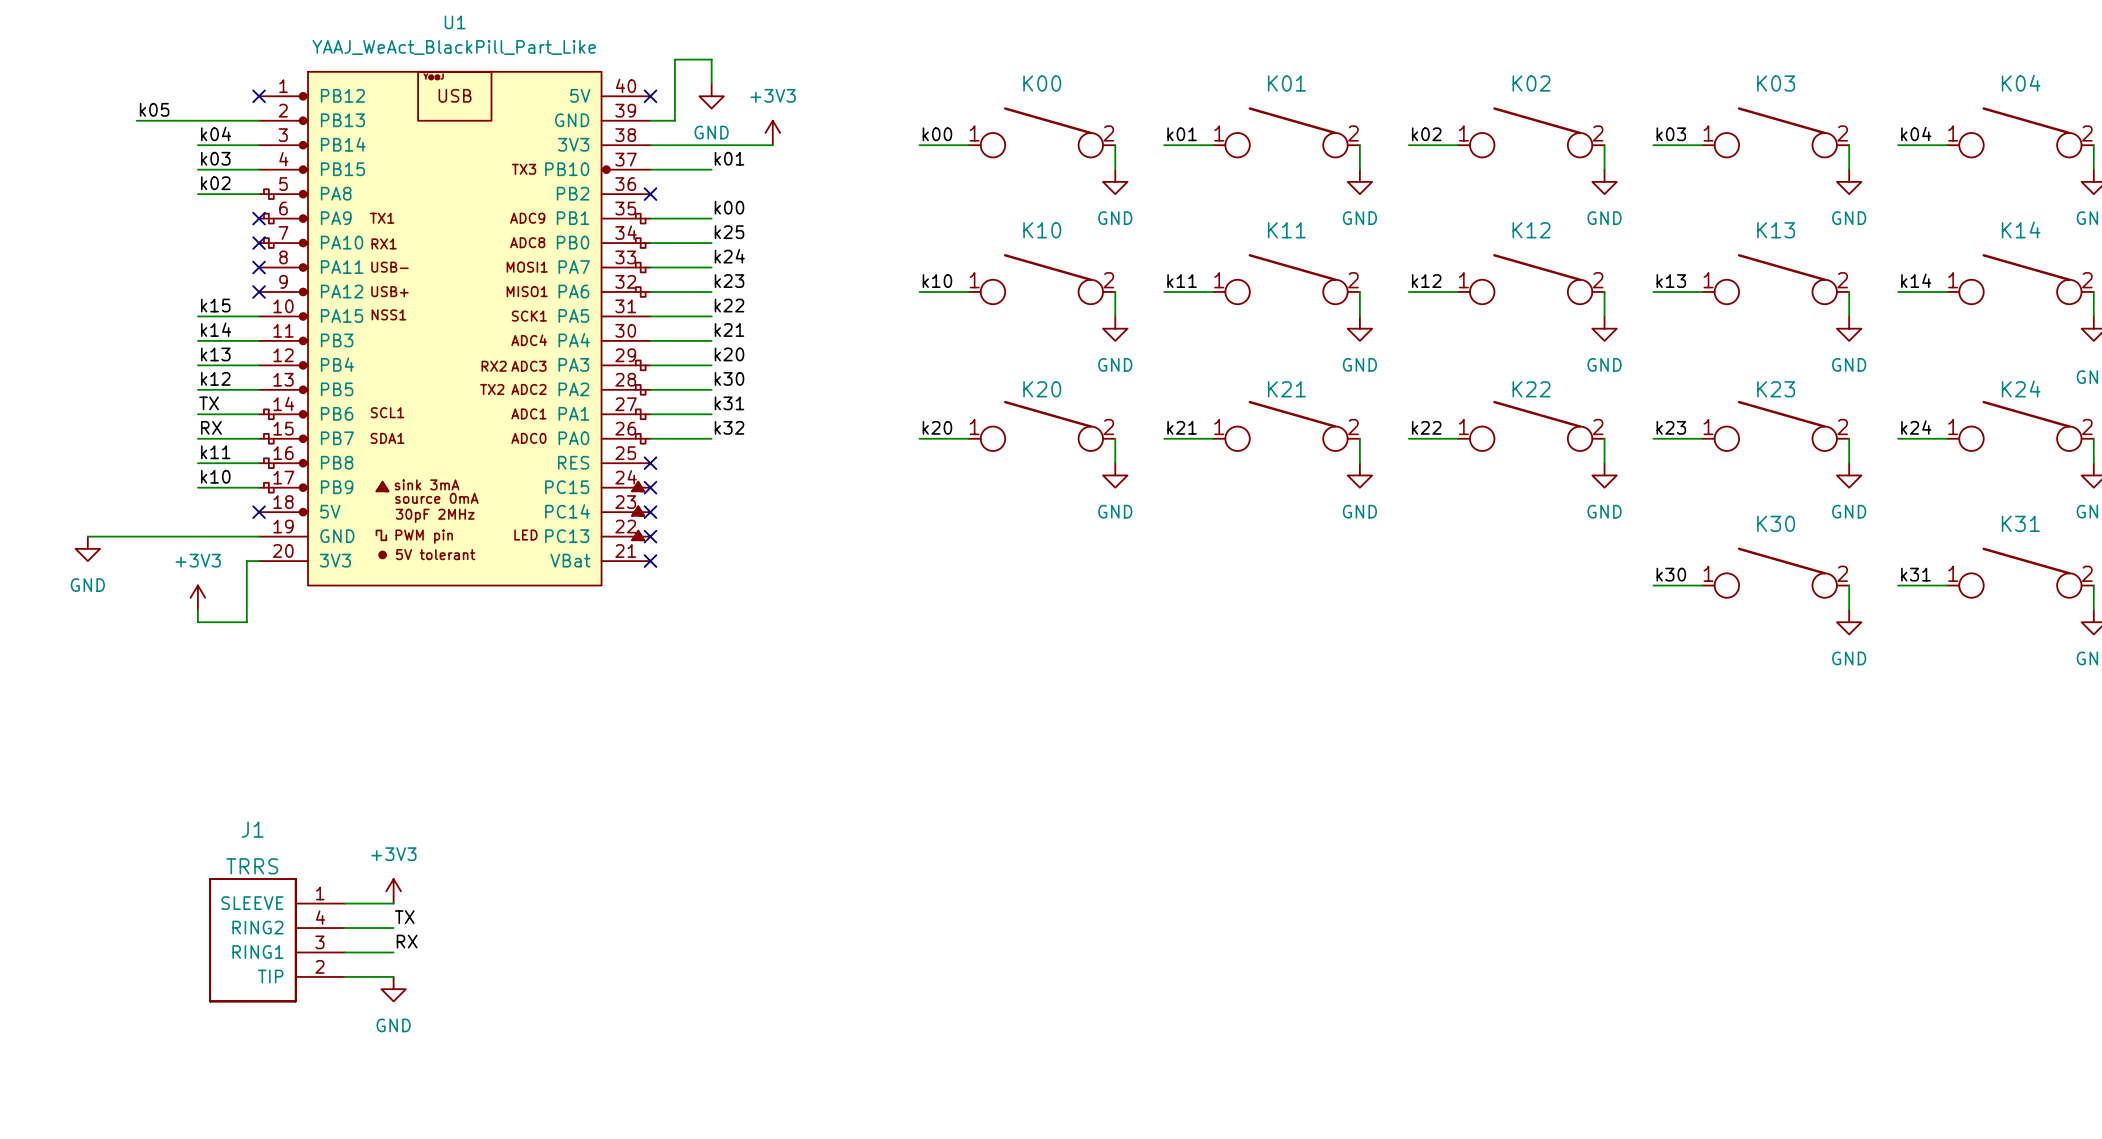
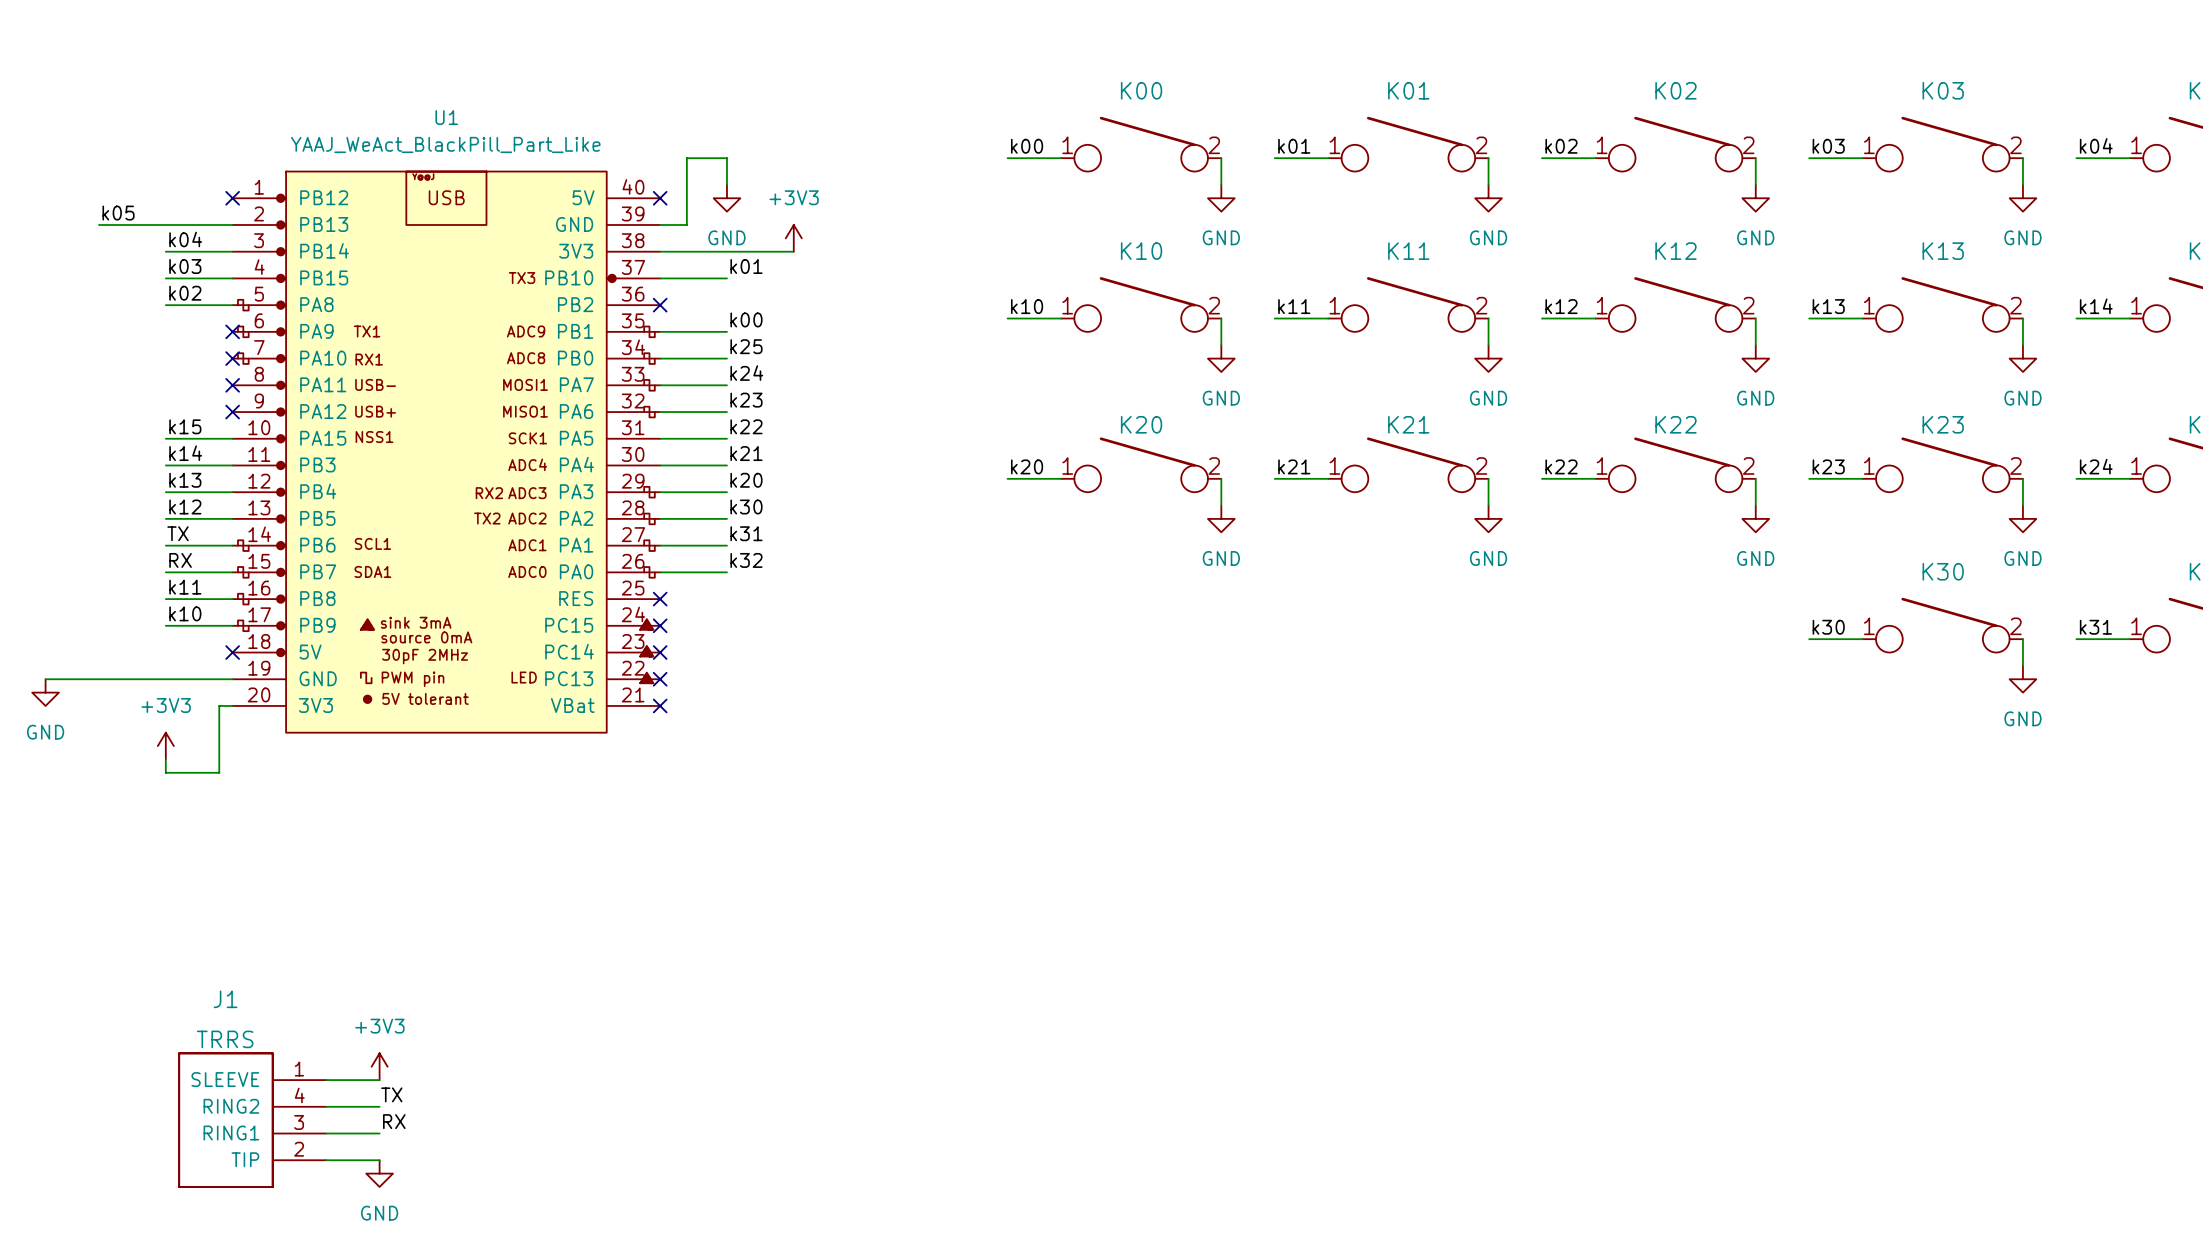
U1 symbol: [259, 71, 651, 586] -> [232, 171, 661, 733]
wire: (711, 84) (711, 59) (674, 59) (674, 120) (650, 120) -> none
no-connect mark: (259, 96) -> none
no-connect mark: (650, 96) -> none
power symbol position: GND (711, 96) -> GND (726, 198)
label position: k05 (154, 109) -> k05 (118, 213)
wire: (136, 120) (259, 120) -> (99, 224) (232, 224)
power symbol position: +3V3 (772, 132) -> +3V3 (793, 238)
label position: k04 (216, 134) -> k04 (185, 239)
wire: (197, 145) (259, 145) -> (165, 251) (232, 251)
wire: none -> (713, 158) (686, 158) (686, 224) (660, 224)
wire: (662, 145) (772, 145) -> (726, 158) (726, 184)
label position: k03 (215, 158) -> k03 (185, 266)
label position: k01 (729, 158) -> k01 (746, 266)
wire: (197, 169) (259, 169) -> (165, 278) (232, 278)
wire: (650, 169) (711, 169) -> (660, 278) (726, 278)
no-connect mark: none -> (232, 198)
no-connect mark: none -> (660, 198)
label position: k02 (215, 183) -> k02 (185, 293)
wire: (197, 194) (259, 194) -> (165, 305) (232, 305)
no-connect mark: (650, 194) -> none
label position: k00 (729, 207) -> k00 (746, 319)
no-connect mark: (259, 218) -> none
wire: (650, 218) (711, 218) -> (660, 331) (726, 331)
wire: none -> (660, 251) (793, 251)
label position: k25 (729, 232) -> k25 (746, 346)
no-connect mark: (259, 243) -> none
wire: (650, 243) (711, 243) -> (660, 358) (726, 358)
label position: k24 (729, 256) -> k24 (746, 373)
no-connect mark: (259, 267) -> none
wire: (650, 267) (711, 267) -> (660, 385) (726, 385)
no-connect mark: none -> (660, 305)
label position: k23 (729, 281) -> k23 (746, 400)
no-connect mark: (259, 291) -> none
wire: (650, 291) (711, 291) -> (660, 412) (726, 412)
no-connect mark: none -> (232, 331)
label position: k15 (215, 305) -> k15 (185, 426)
label position: k22 (729, 305) -> k22 (746, 426)
wire: (197, 316) (259, 316) -> (165, 438) (232, 438)
wire: (650, 316) (711, 316) -> (660, 438) (726, 438)
no-connect mark: none -> (232, 358)
label position: k14 (216, 329) -> k14 (185, 453)
label position: k21 (729, 329) -> k21 (746, 453)
wire: (197, 340) (259, 340) -> (165, 465) (232, 465)
wire: (650, 340) (711, 340) -> (660, 465) (726, 465)
no-connect mark: none -> (232, 385)
label position: k13 (215, 354) -> k13 (185, 480)
label position: k20 (729, 354) -> k20 (746, 480)
wire: (197, 365) (259, 365) -> (165, 492) (232, 492)
wire: (650, 365) (711, 365) -> (660, 492) (726, 492)
no-connect mark: none -> (232, 412)
label position: k12 (215, 378) -> k12 (185, 507)
label position: k30 (729, 378) -> k30 (746, 507)
wire: (197, 389) (259, 389) -> (165, 518) (232, 518)
wire: (650, 389) (711, 389) -> (660, 518) (726, 518)
label position: TX (209, 403) -> TX (178, 533)
label position: k31 (729, 403) -> k31 (746, 533)
wire: (197, 414) (259, 414) -> (165, 545) (232, 545)
wire: (650, 414) (711, 414) -> (660, 545) (726, 545)
label position: RX (211, 427) -> RX (180, 560)
label position: k32 (729, 427) -> k32 (746, 560)
wire: (197, 438) (259, 438) -> (165, 572) (232, 572)
wire: (650, 438) (711, 438) -> (660, 572) (726, 572)
label position: k11 (215, 452) -> k11 (185, 587)
wire: (197, 463) (259, 463) -> (165, 599) (232, 599)
no-connect mark: (650, 463) -> none
label position: k10 (215, 476) -> k10 (185, 613)
wire: (197, 487) (259, 487) -> (165, 625) (232, 625)
no-connect mark: (650, 487) -> none
no-connect mark: (259, 512) -> none
no-connect mark: (650, 512) -> none
wire: (87, 536) (259, 536) -> none
no-connect mark: (650, 536) -> none
power symbol position: GND (87, 548) -> GND (45, 692)
no-connect mark: none -> (660, 599)
wire: (259, 561) (246, 561) (246, 622) (210, 622) -> none
no-connect mark: (650, 561) -> none
no-connect mark: none -> (660, 625)
power symbol position: +3V3 (197, 597) -> +3V3 (165, 746)
no-connect mark: none -> (232, 652)
no-connect mark: none -> (660, 652)
wire: (197, 610) (197, 622) -> (45, 679) (219, 679)
no-connect mark: none -> (660, 679)
wire: none -> (232, 705) (219, 705) (219, 772) (165, 772) (165, 759)
no-connect mark: none -> (660, 705)
power symbol position: +3V3 (393, 891) -> +3V3 (379, 1066)
wire: (344, 903) (393, 903) -> (326, 1080) (379, 1080)
label position: TX (404, 917) -> TX (391, 1094)
wire: (344, 928) (393, 928) -> (326, 1106) (379, 1106)
J1 position: (277, 940) -> (252, 1120)
label position: RX (407, 941) -> RX (394, 1121)
wire: (344, 952) (393, 952) -> (326, 1133) (379, 1133)
wire: (344, 976) (393, 976) -> (326, 1160) (379, 1160)
power symbol position: GND (393, 989) -> GND (379, 1173)

